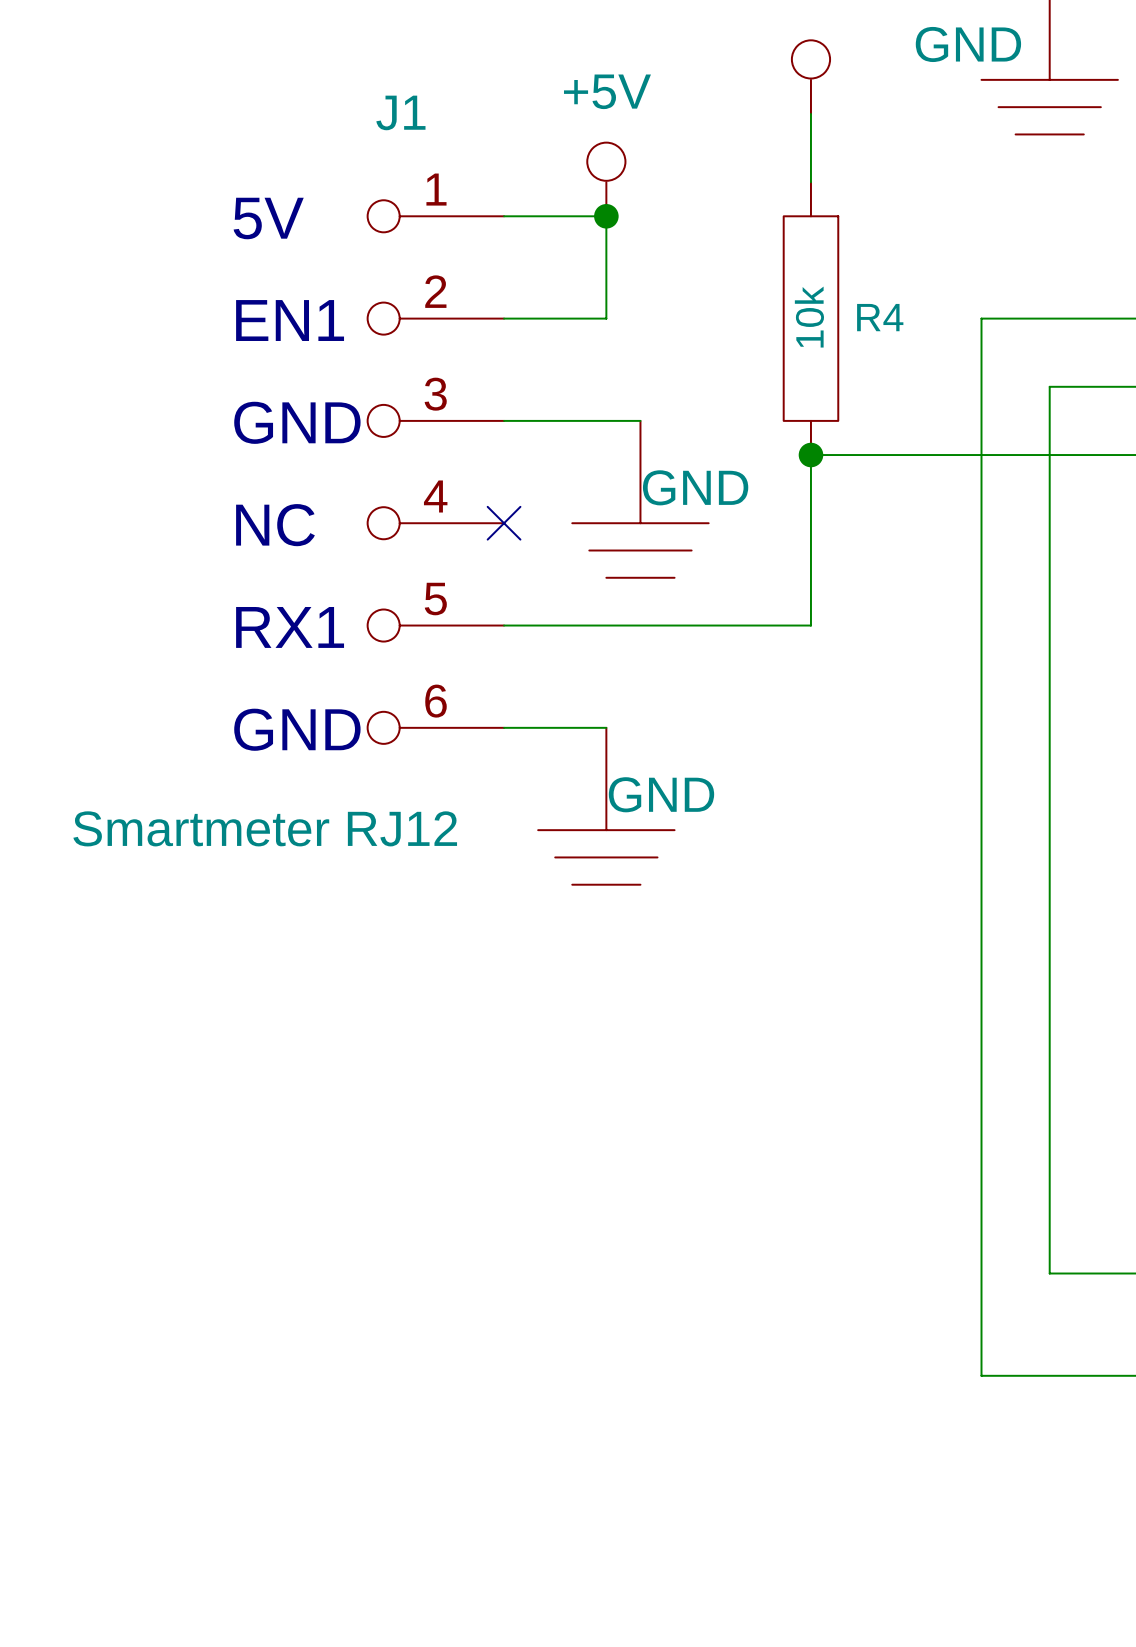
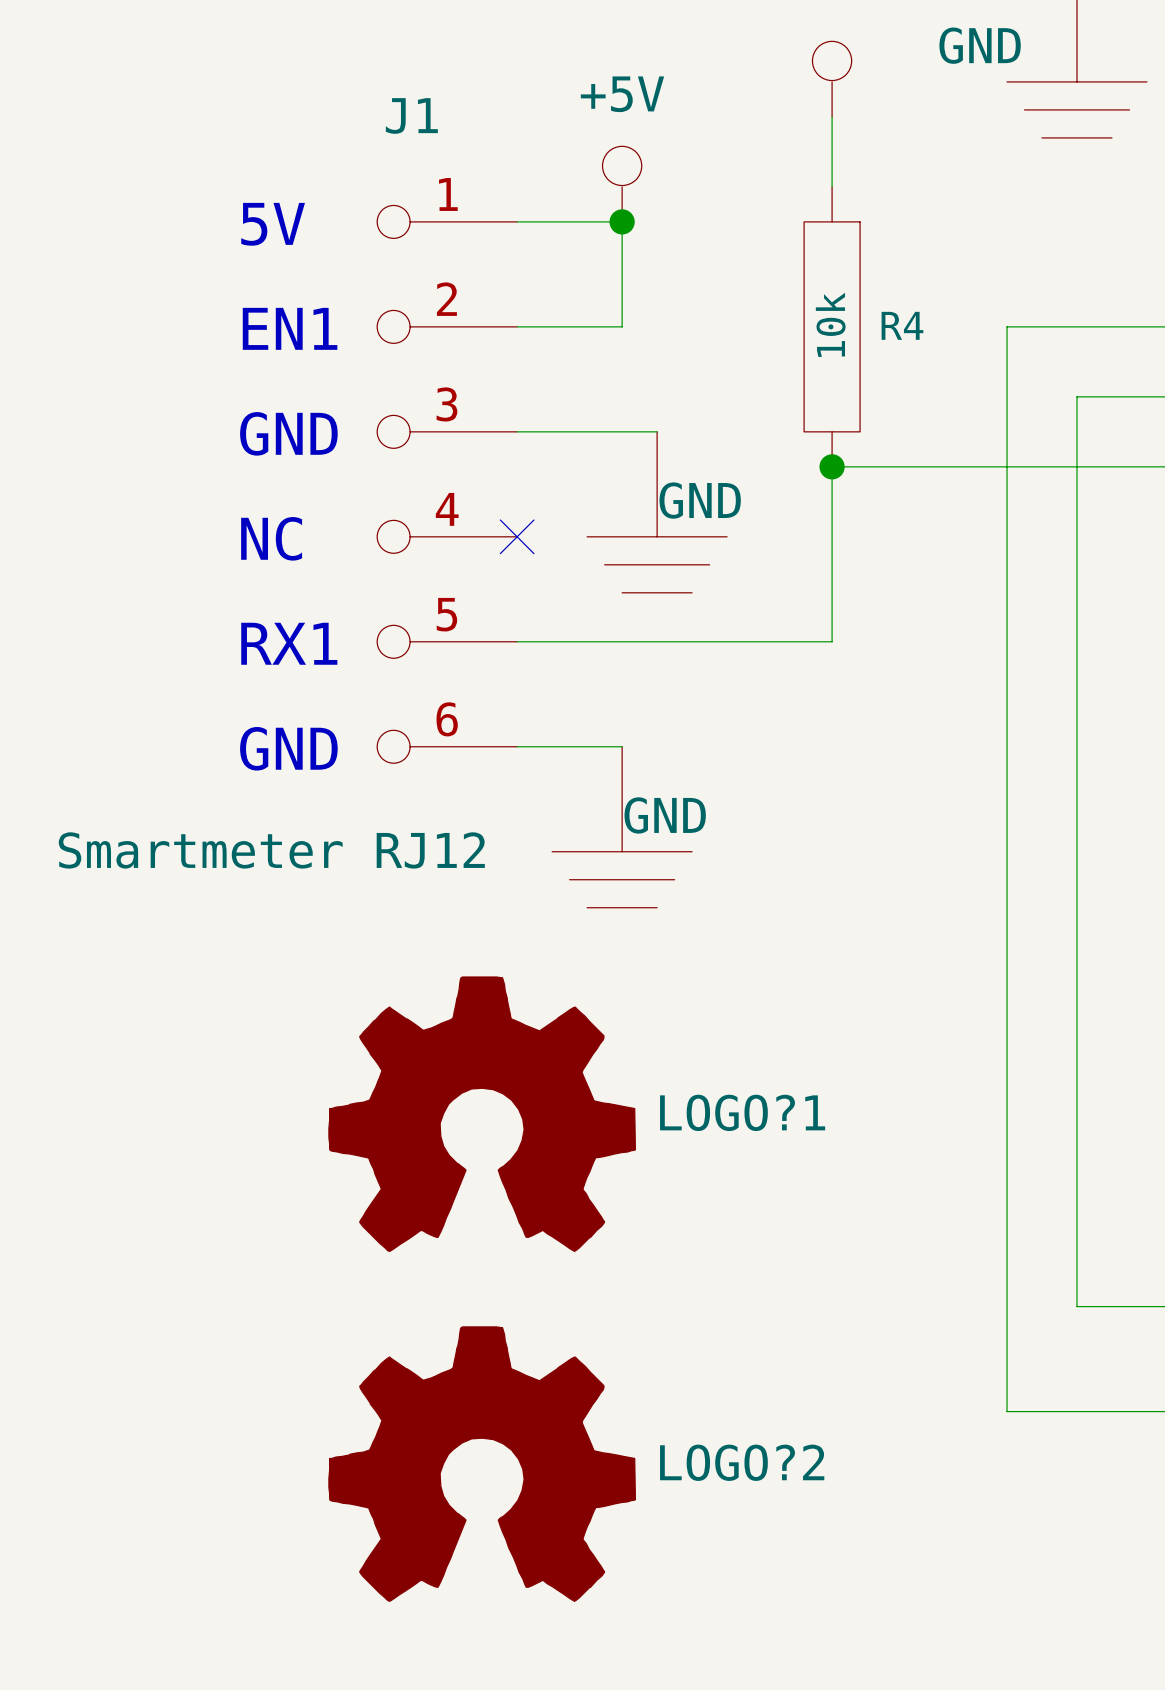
LOGO?1: none -> (482, 1114)
LOGO?2: none -> (482, 1464)

